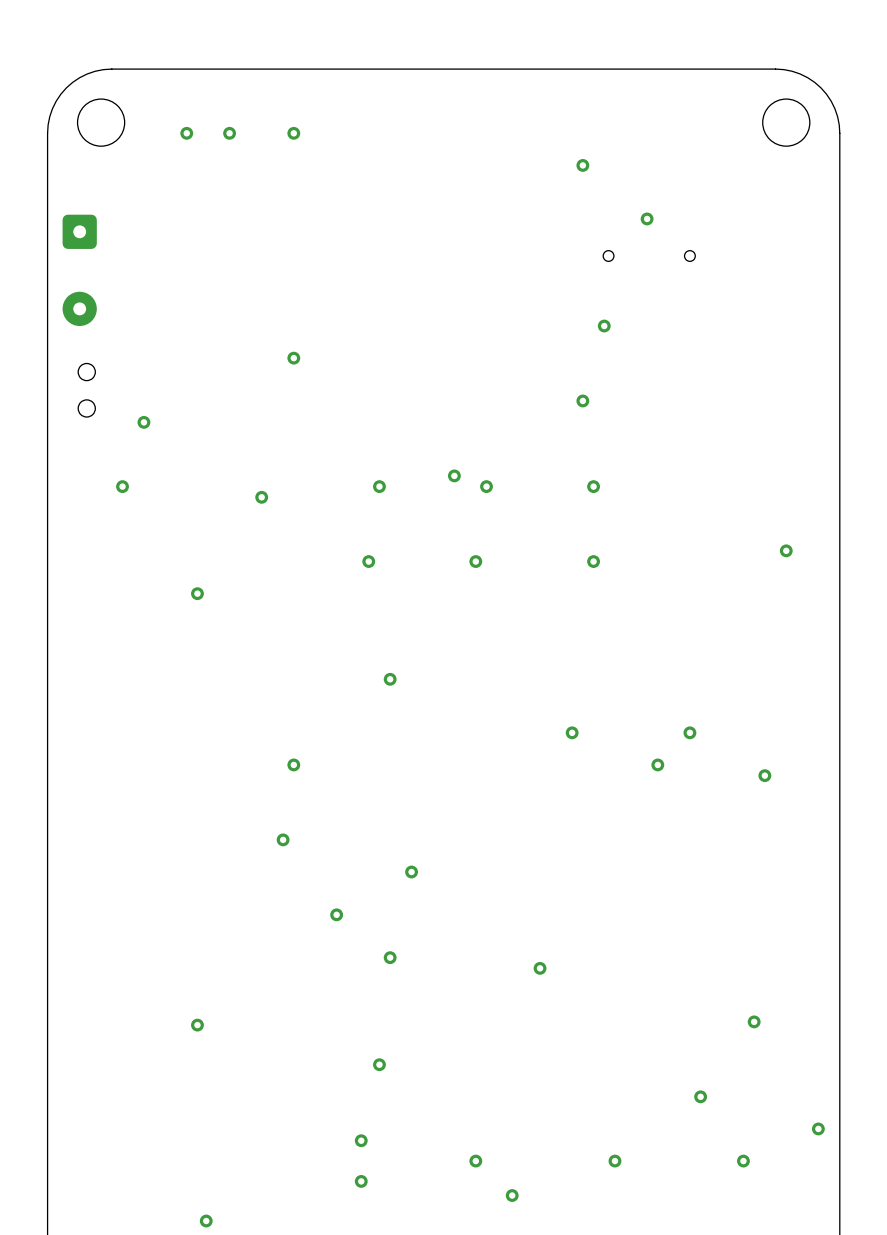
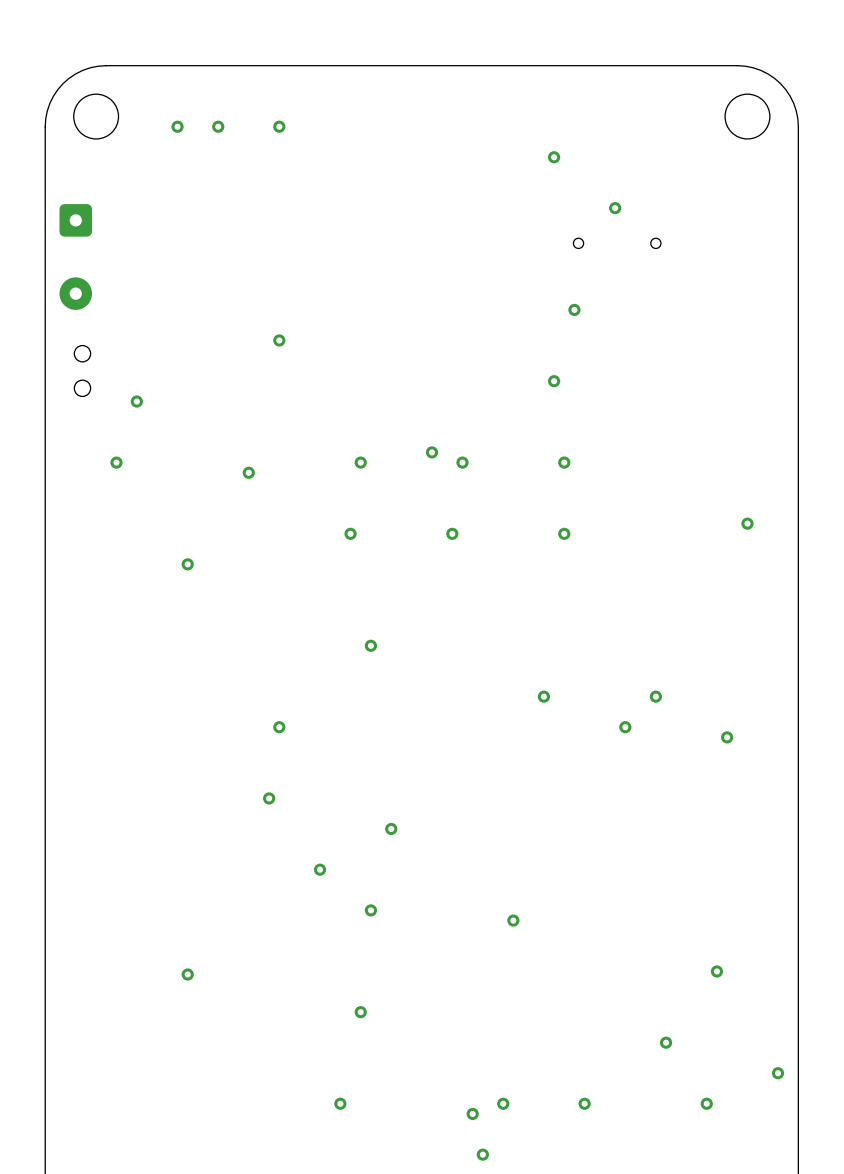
via: (361, 1140) -> none
via: none -> (340, 1103)
via: (475, 1161) -> none
via: none -> (503, 1103)
via: none -> (472, 1113)
via: (361, 1181) -> none
via: (512, 1195) -> none
via: none -> (482, 1154)
via: (206, 1221) -> none

